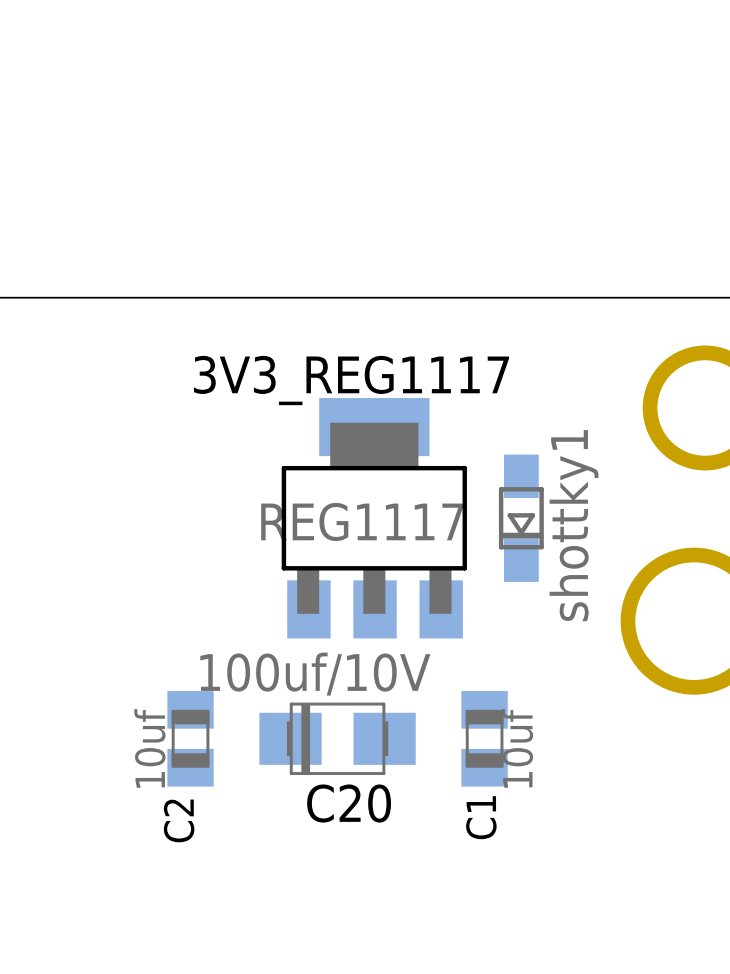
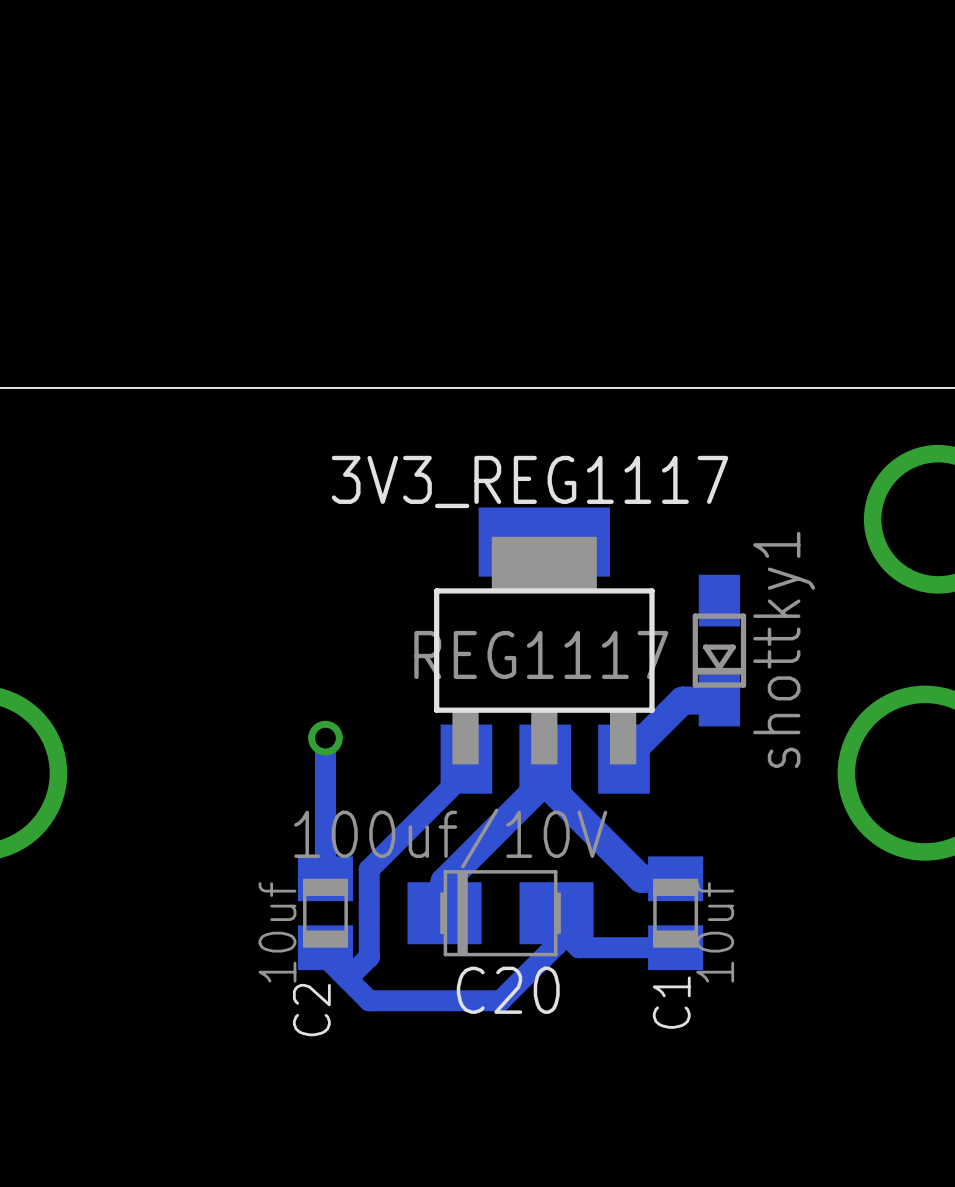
track: none -> (719, 700) (682, 700) (623, 759)
track: none -> (325, 738) (325, 878)
via: none -> (325, 738)
track: none -> (466, 759) (466, 772) (369, 869) (369, 957) (347, 978)
track: none -> (675, 878) (641, 878) (544, 781) (444, 881) (444, 913)
track: none -> (544, 913) (578, 947) (675, 947)
track: none -> (556, 913) (556, 944) (500, 1000) (369, 1000) (325, 957) (325, 947)

